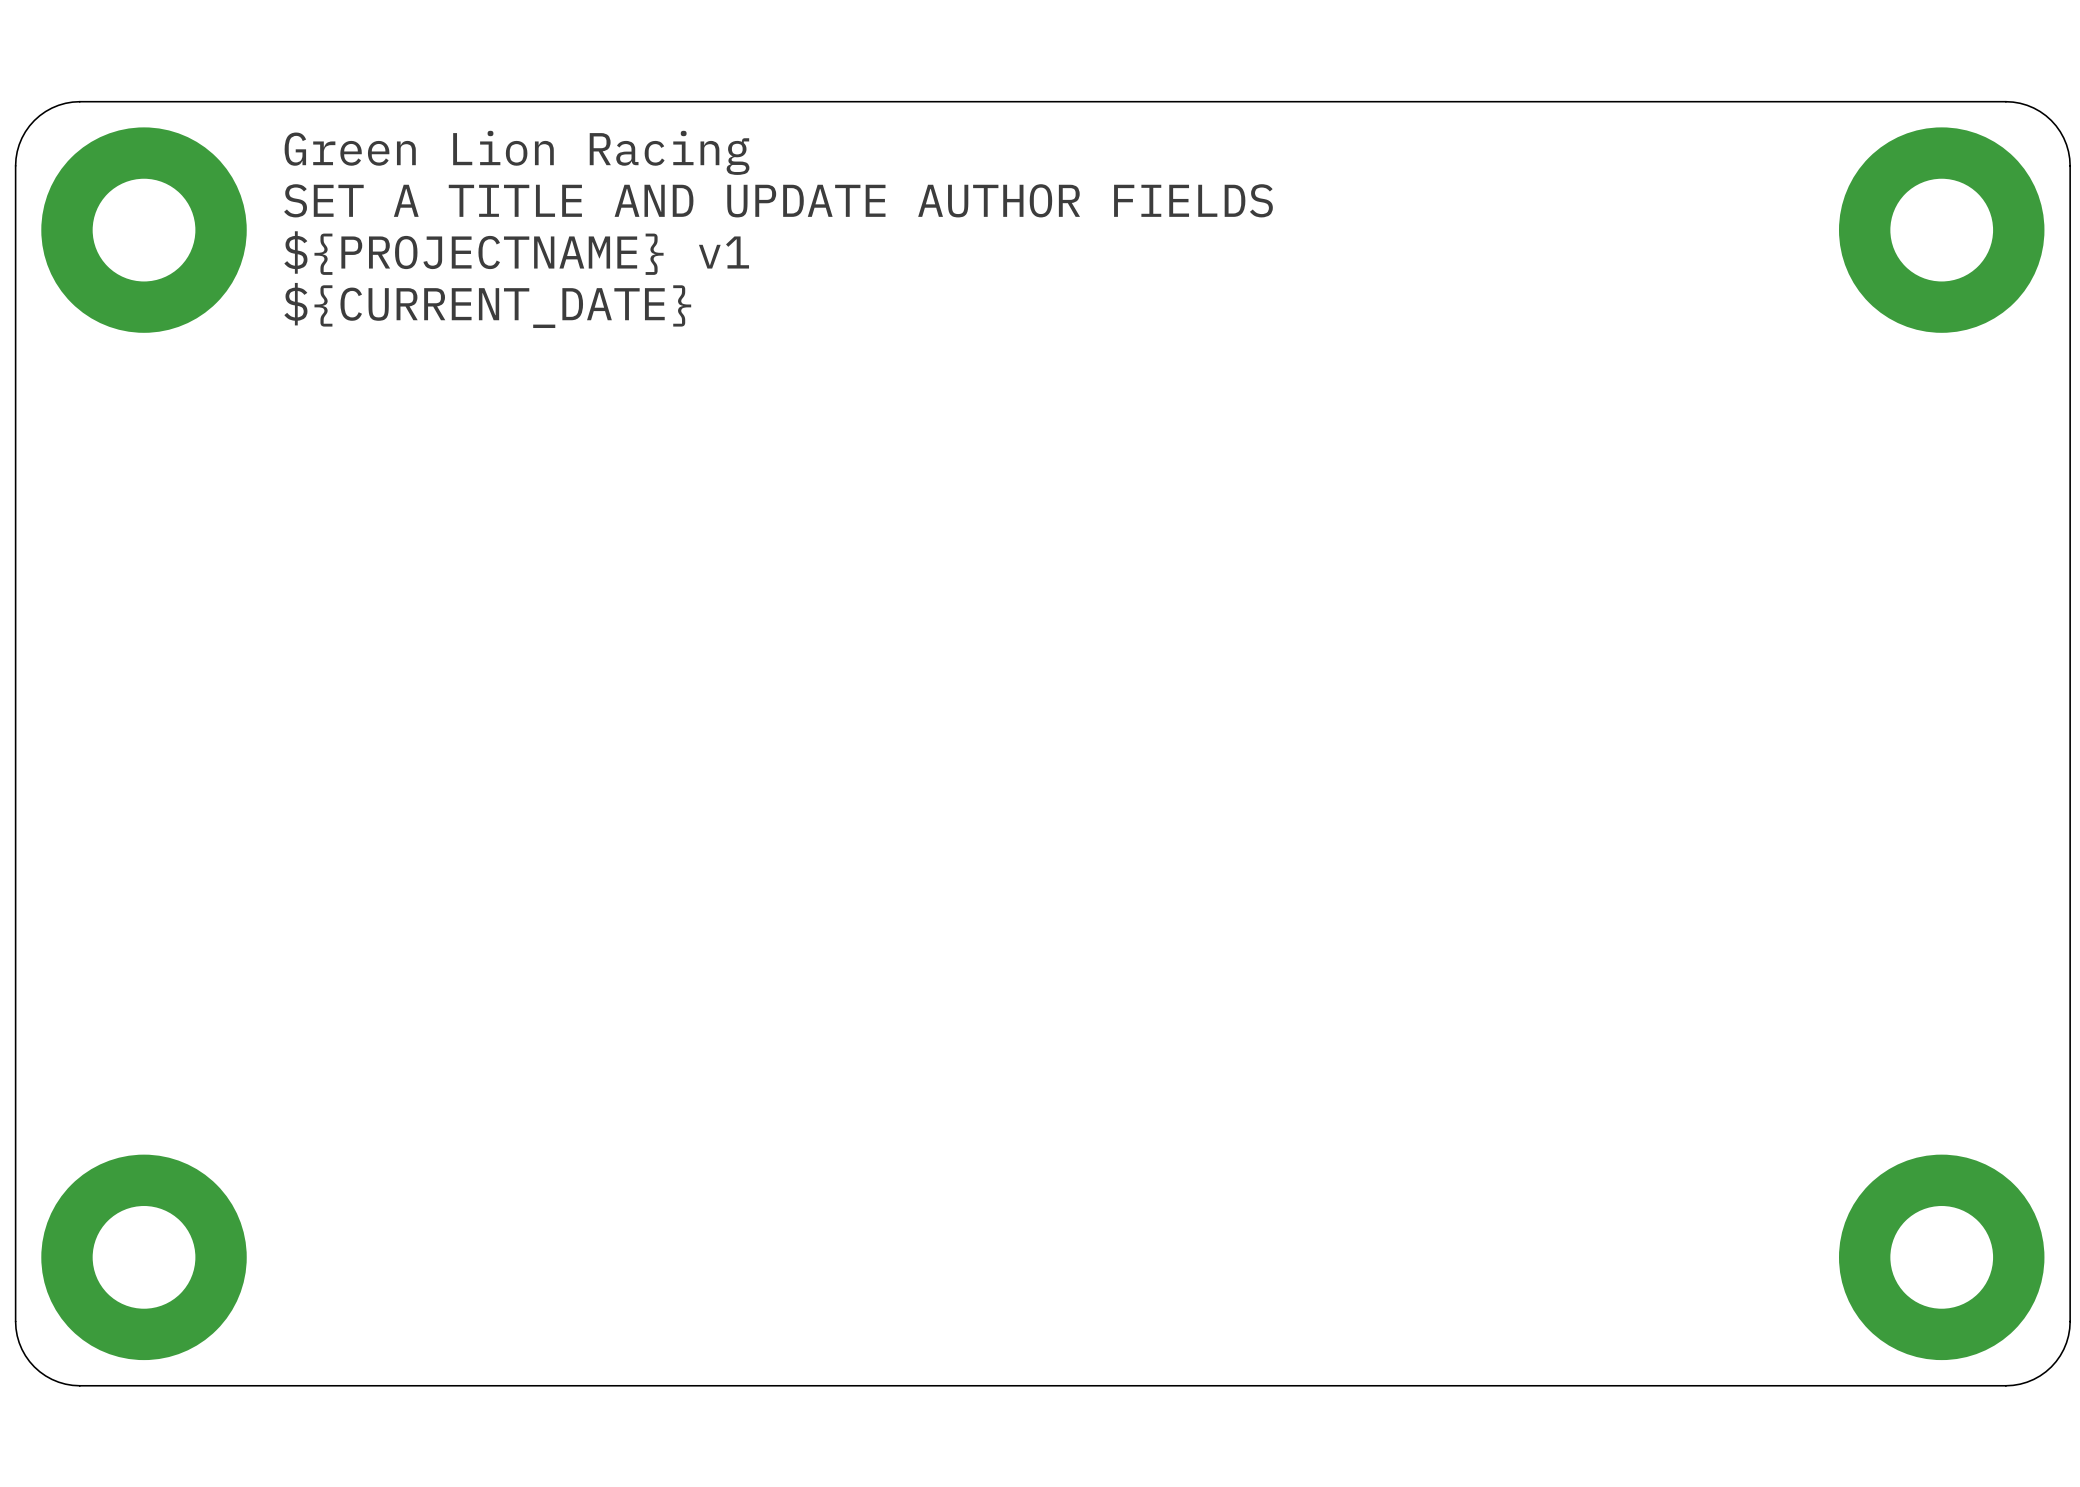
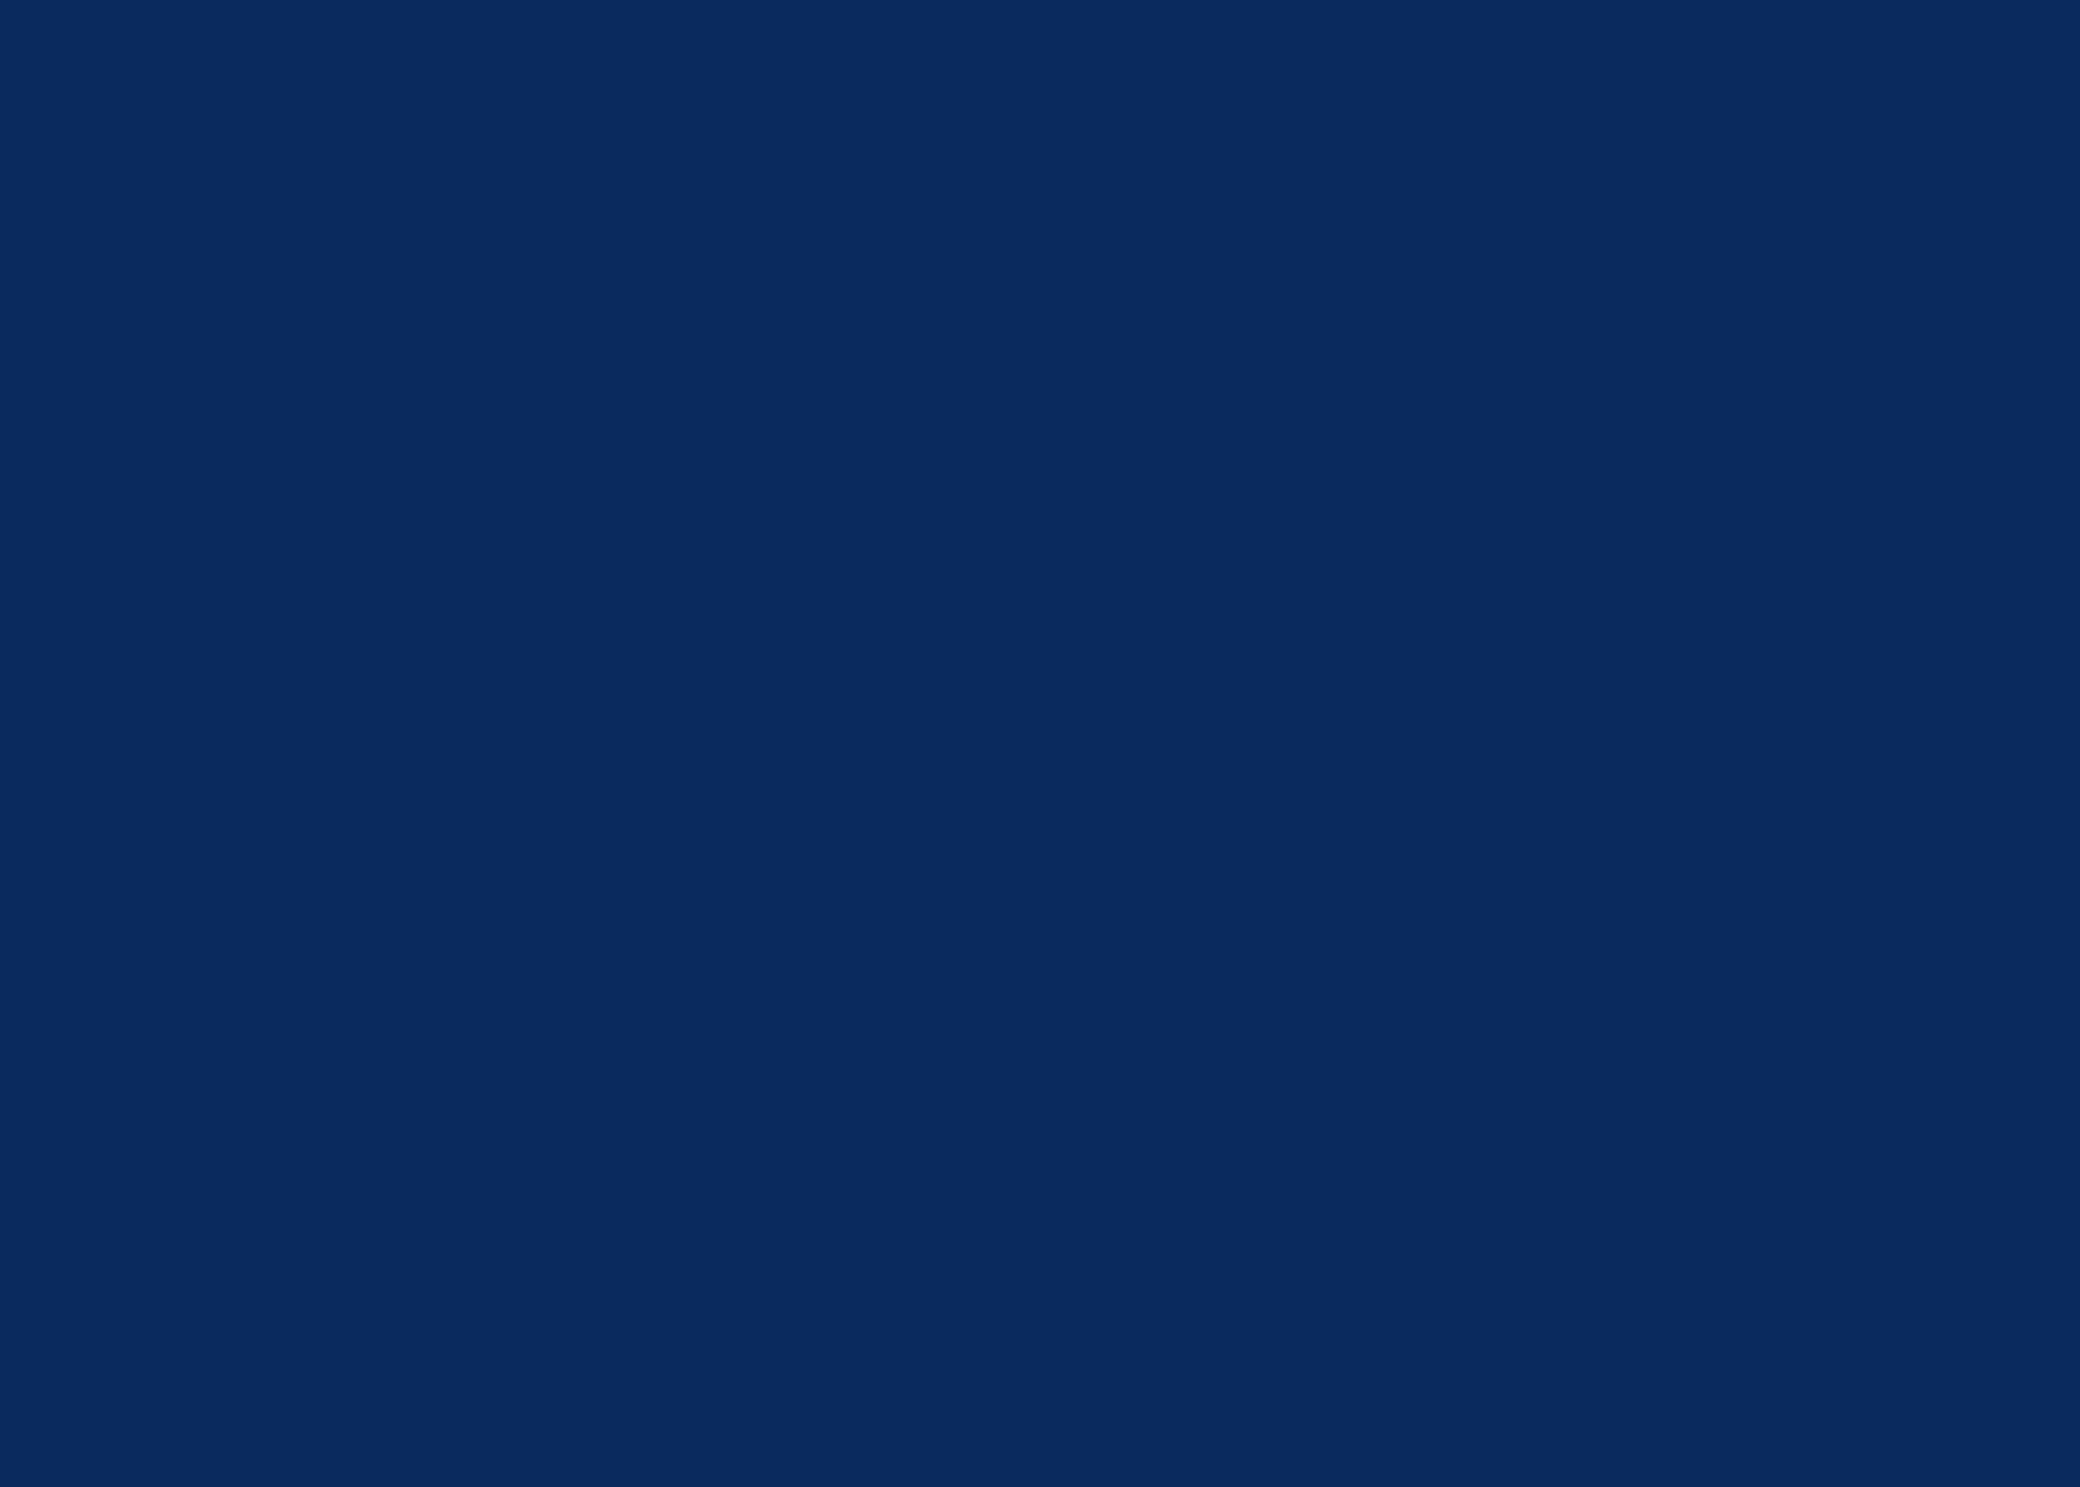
board edge: (2005, 101) (79, 101) (65, 103) (45, 111) (34, 120) (25, 131) (19, 144) (15, 165) (15, 1321) (17, 1335) (25, 1355) (34, 1366) (45, 1375) (58, 1382) (79, 1385) (2005, 1385) (2027, 1382) (2040, 1375) (2056, 1361) (2063, 1349) (2068, 1335) (2070, 1321) (2070, 165) (2068, 151) (2063, 138) (2051, 120) (2033, 108) (2020, 103) (2005, 101) -> none
text: Green Lion Racing (517, 152) -> none
text: SET A TITLE AND UPDATE AUTHOR FIELDS (778, 200) -> none
part: (144, 230) -> none
part: (1941, 230) -> none
text: ${PROJECTNAME} v1 (516, 253) -> none
text: ${CURRENT_DATE} (487, 305) -> none
part: (144, 1257) -> none
part: (1941, 1257) -> none

